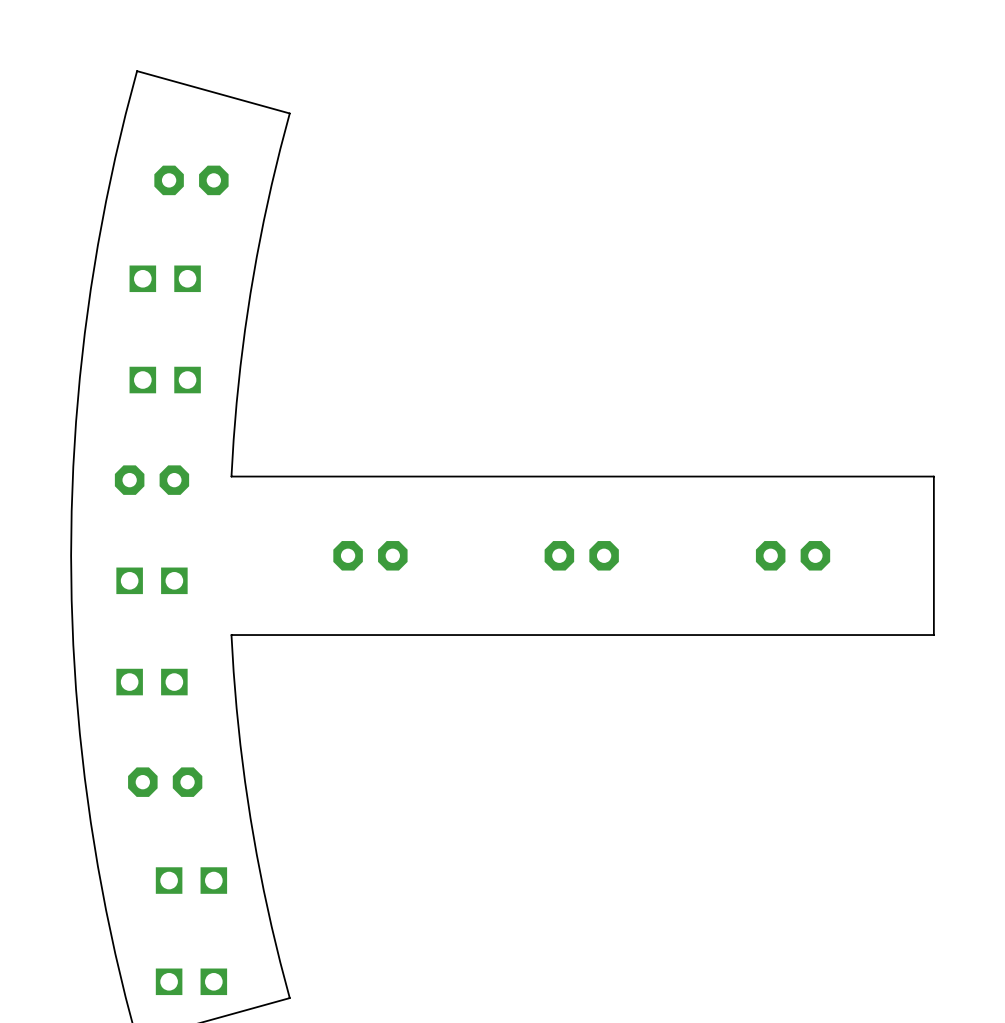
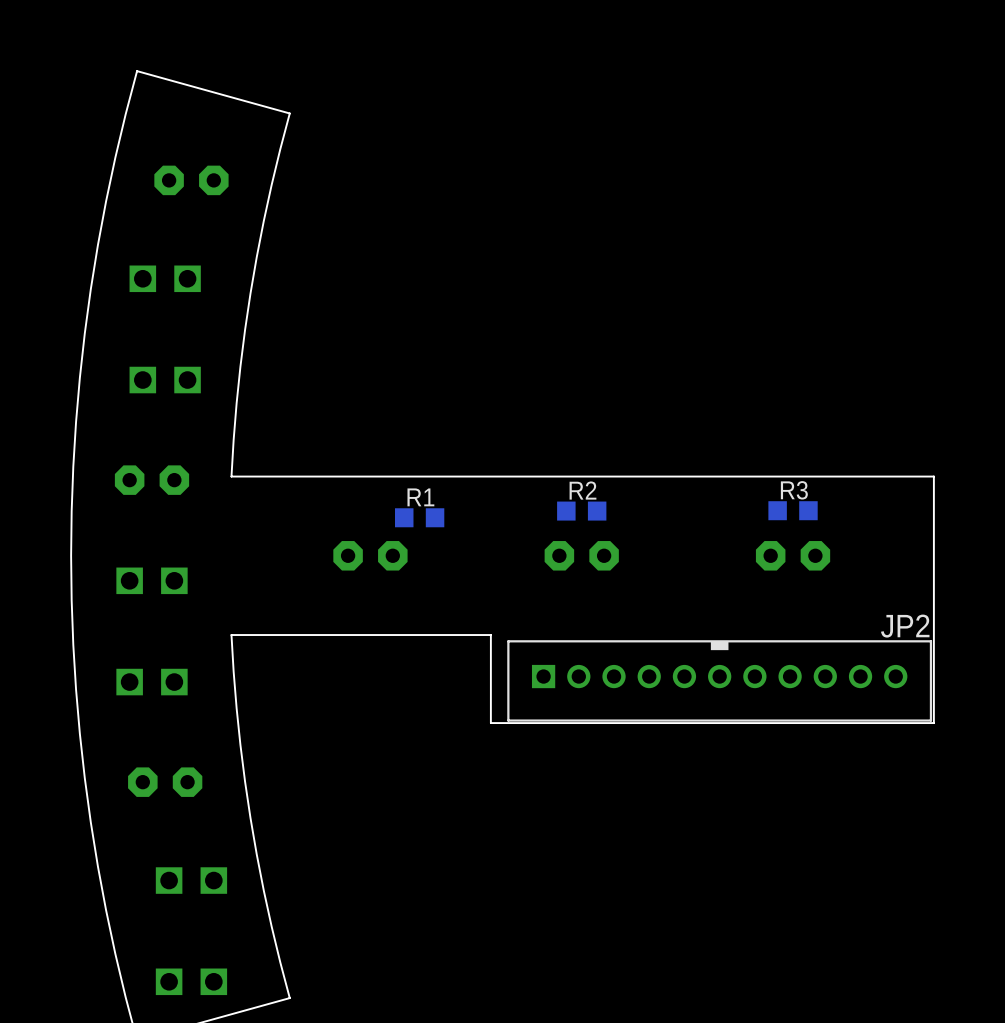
R3: none -> (793, 510)
R2: none -> (581, 511)
R1: none -> (419, 517)
board edge: (933, 635) (490, 635) -> (933, 635) (933, 723) (490, 723) (490, 635)
JP2: none -> (719, 680)

